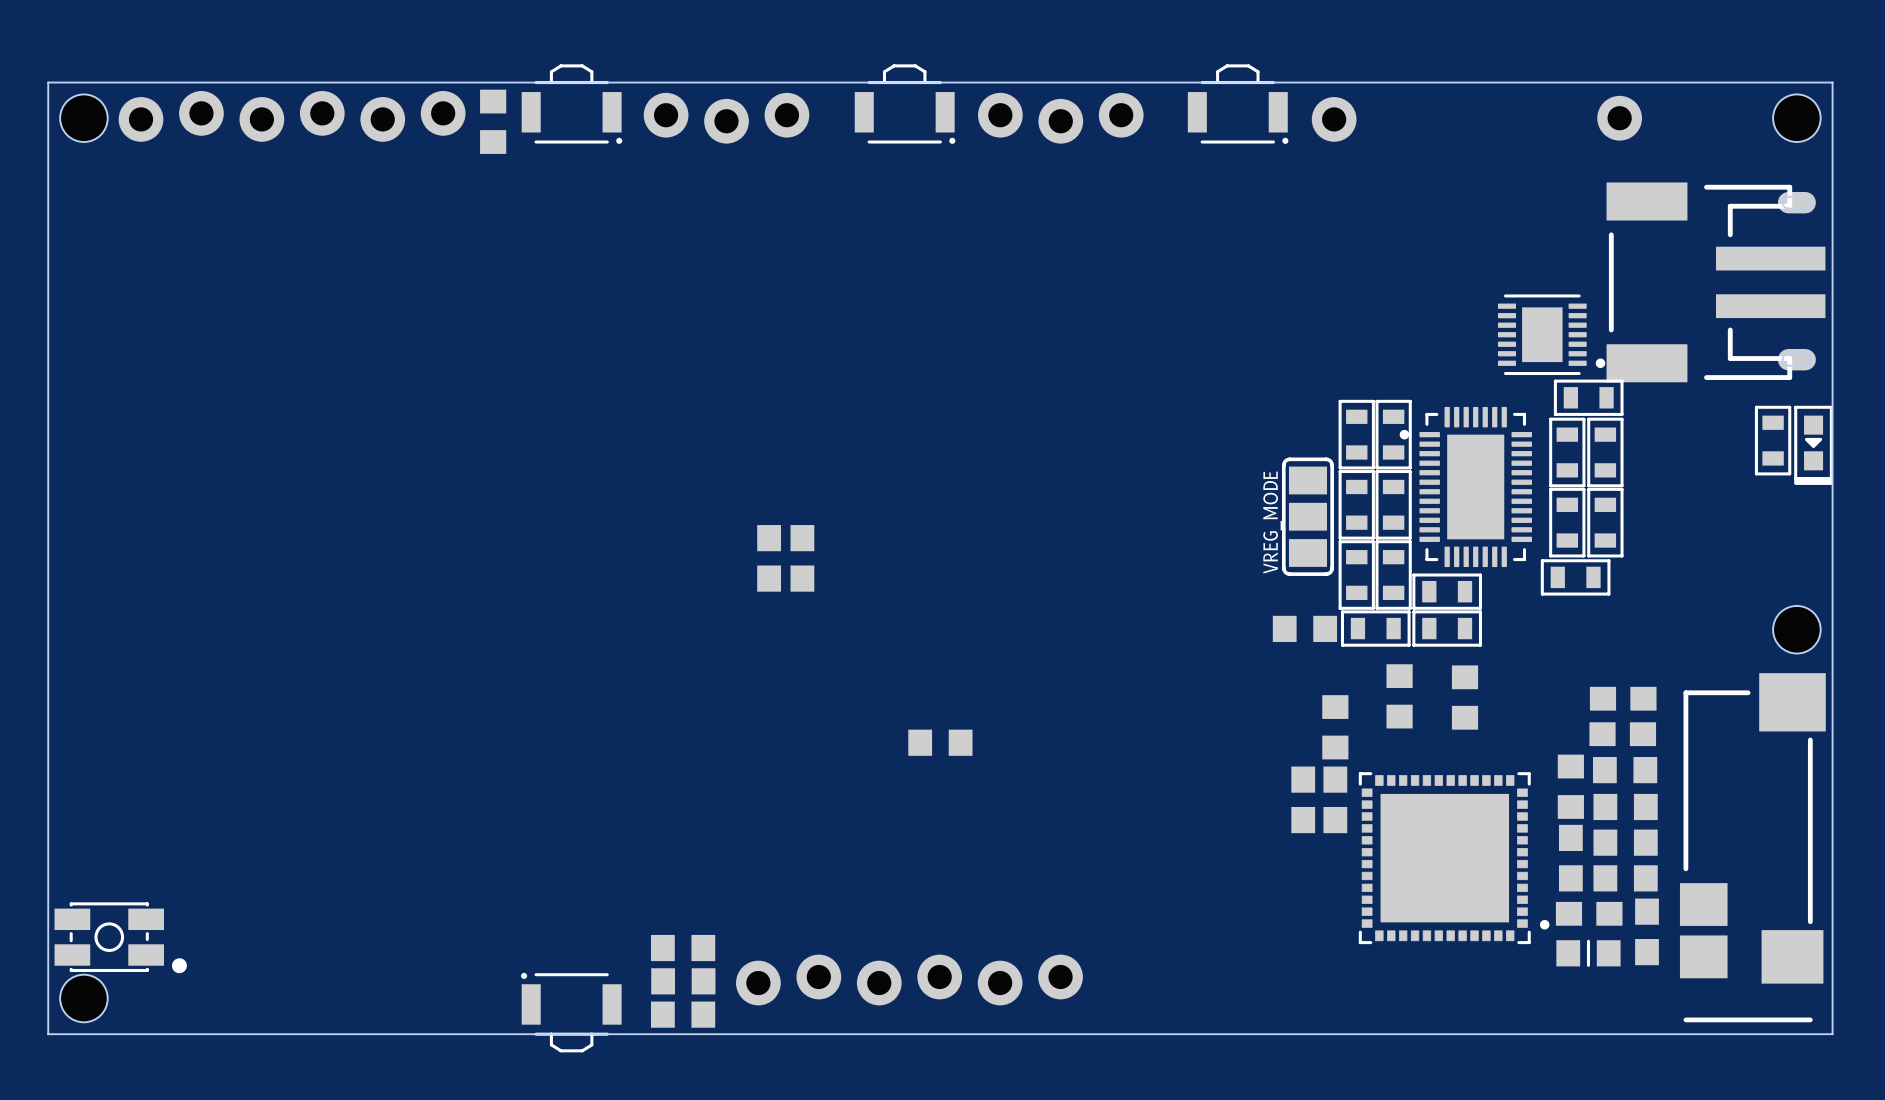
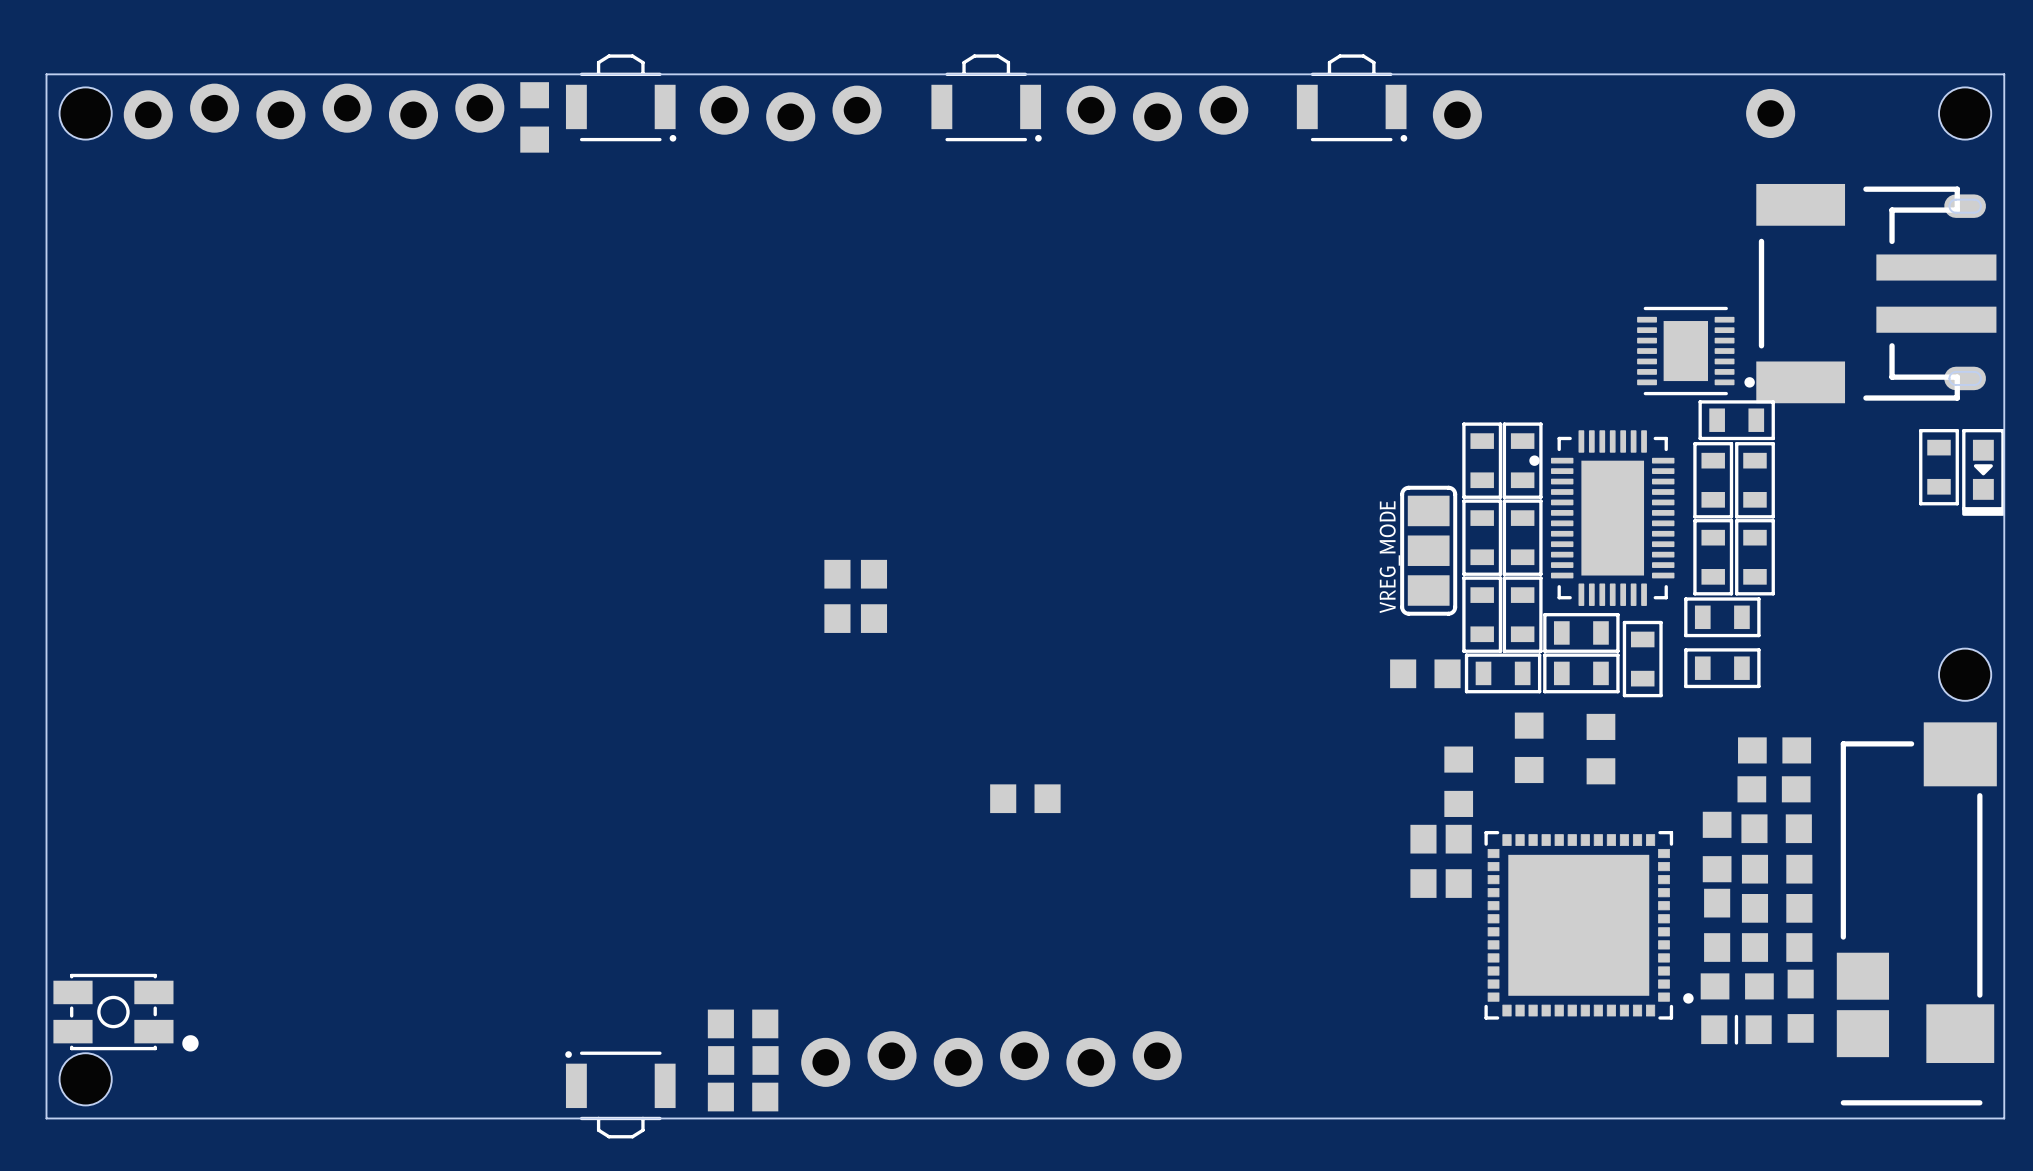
part: none -> (1642, 659)
part: none -> (1722, 668)

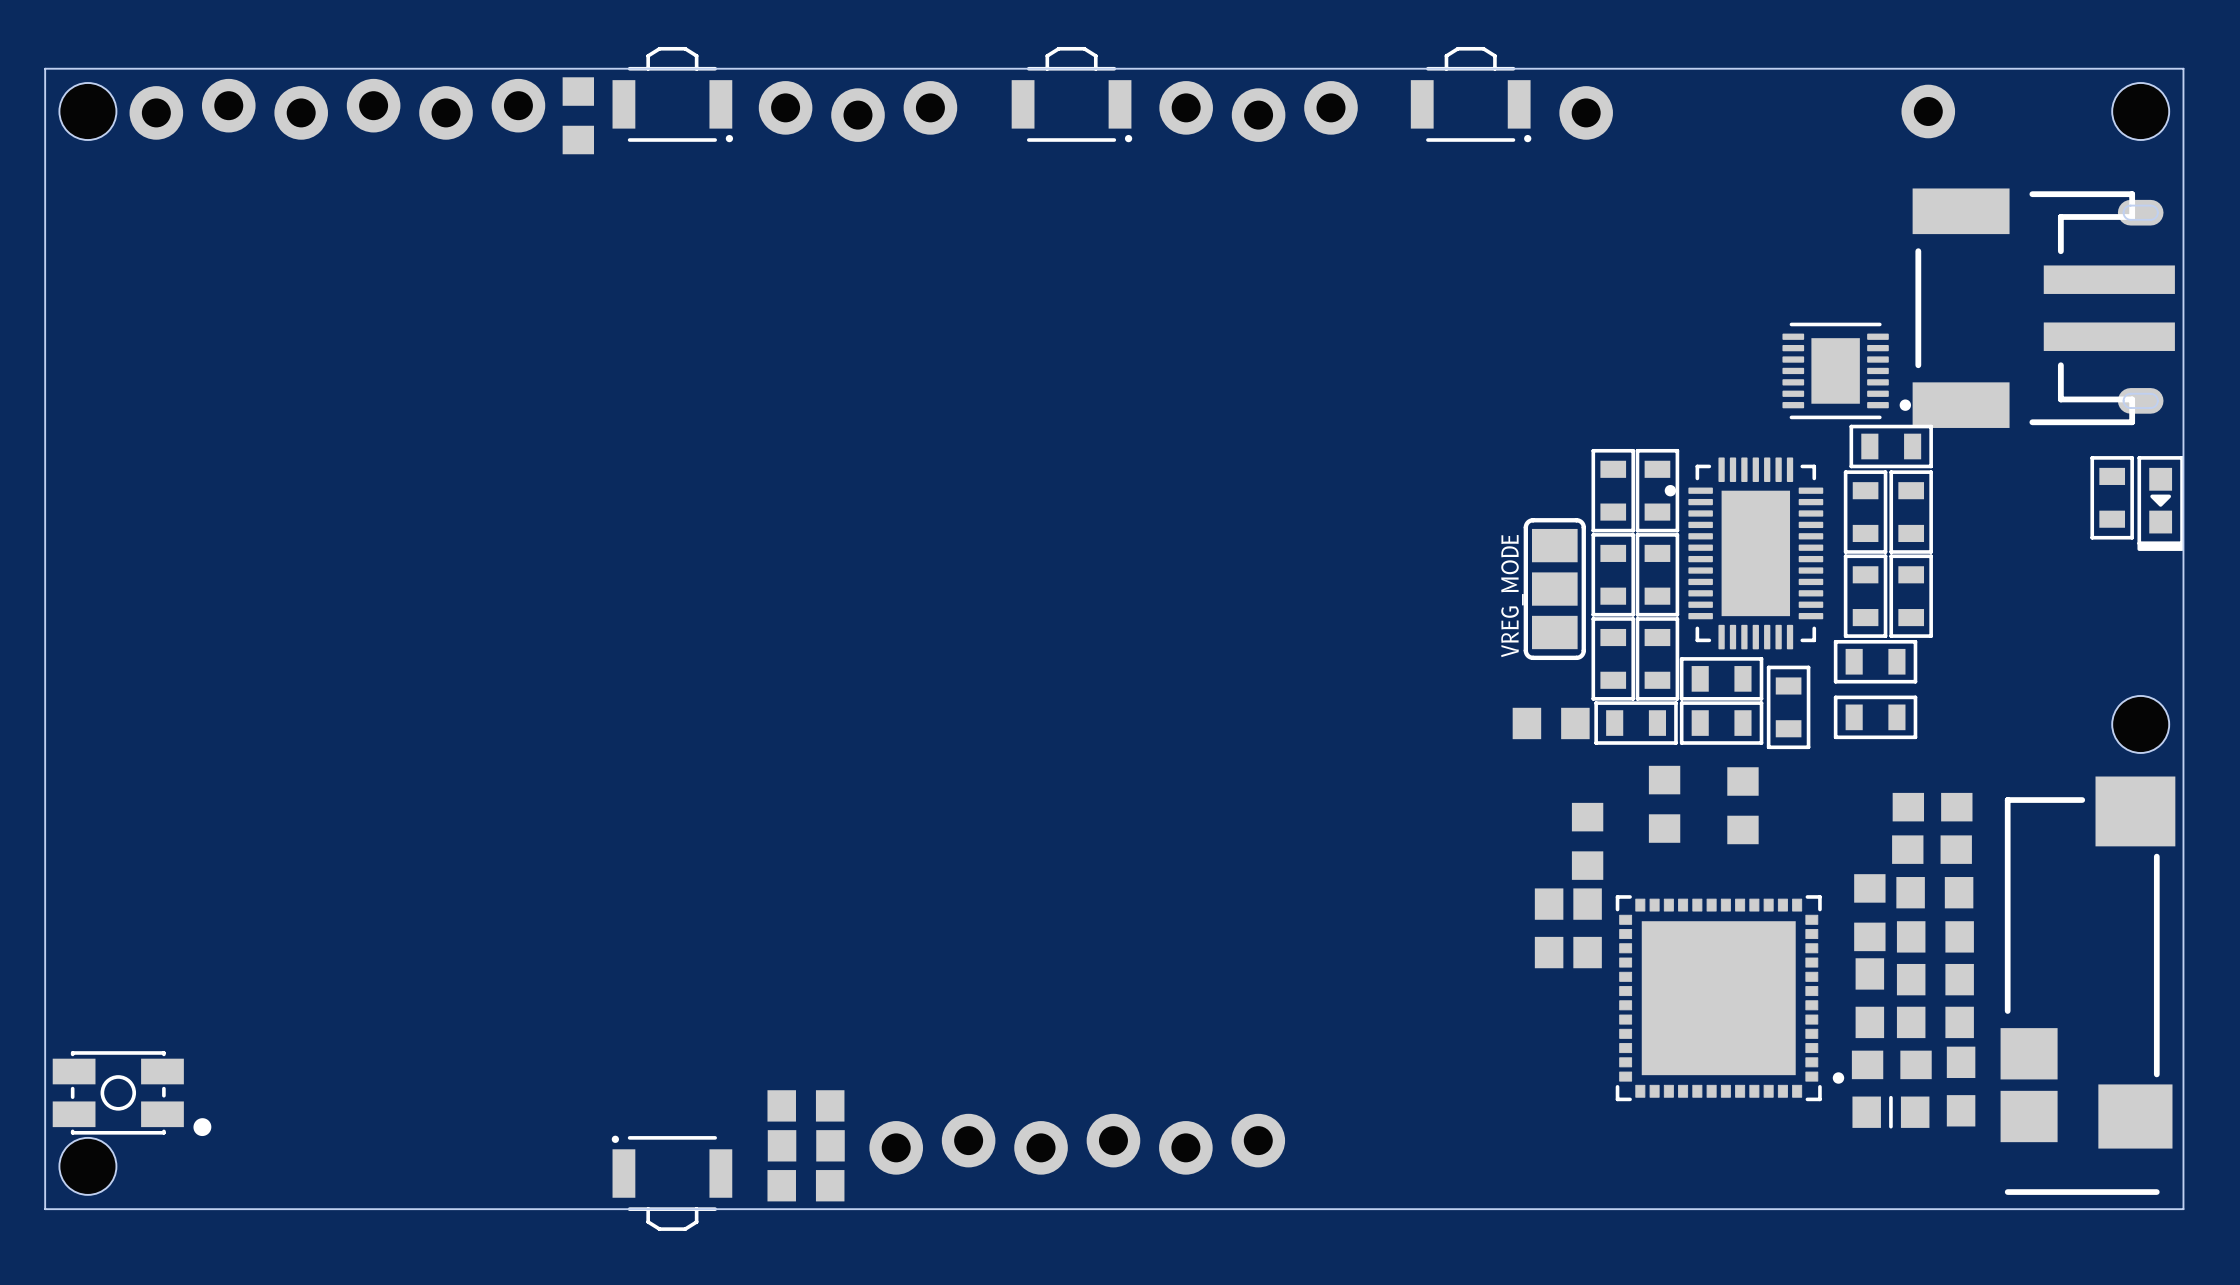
part: (837, 596) -> none
part: (873, 596) -> none
part: (1025, 798) -> none

